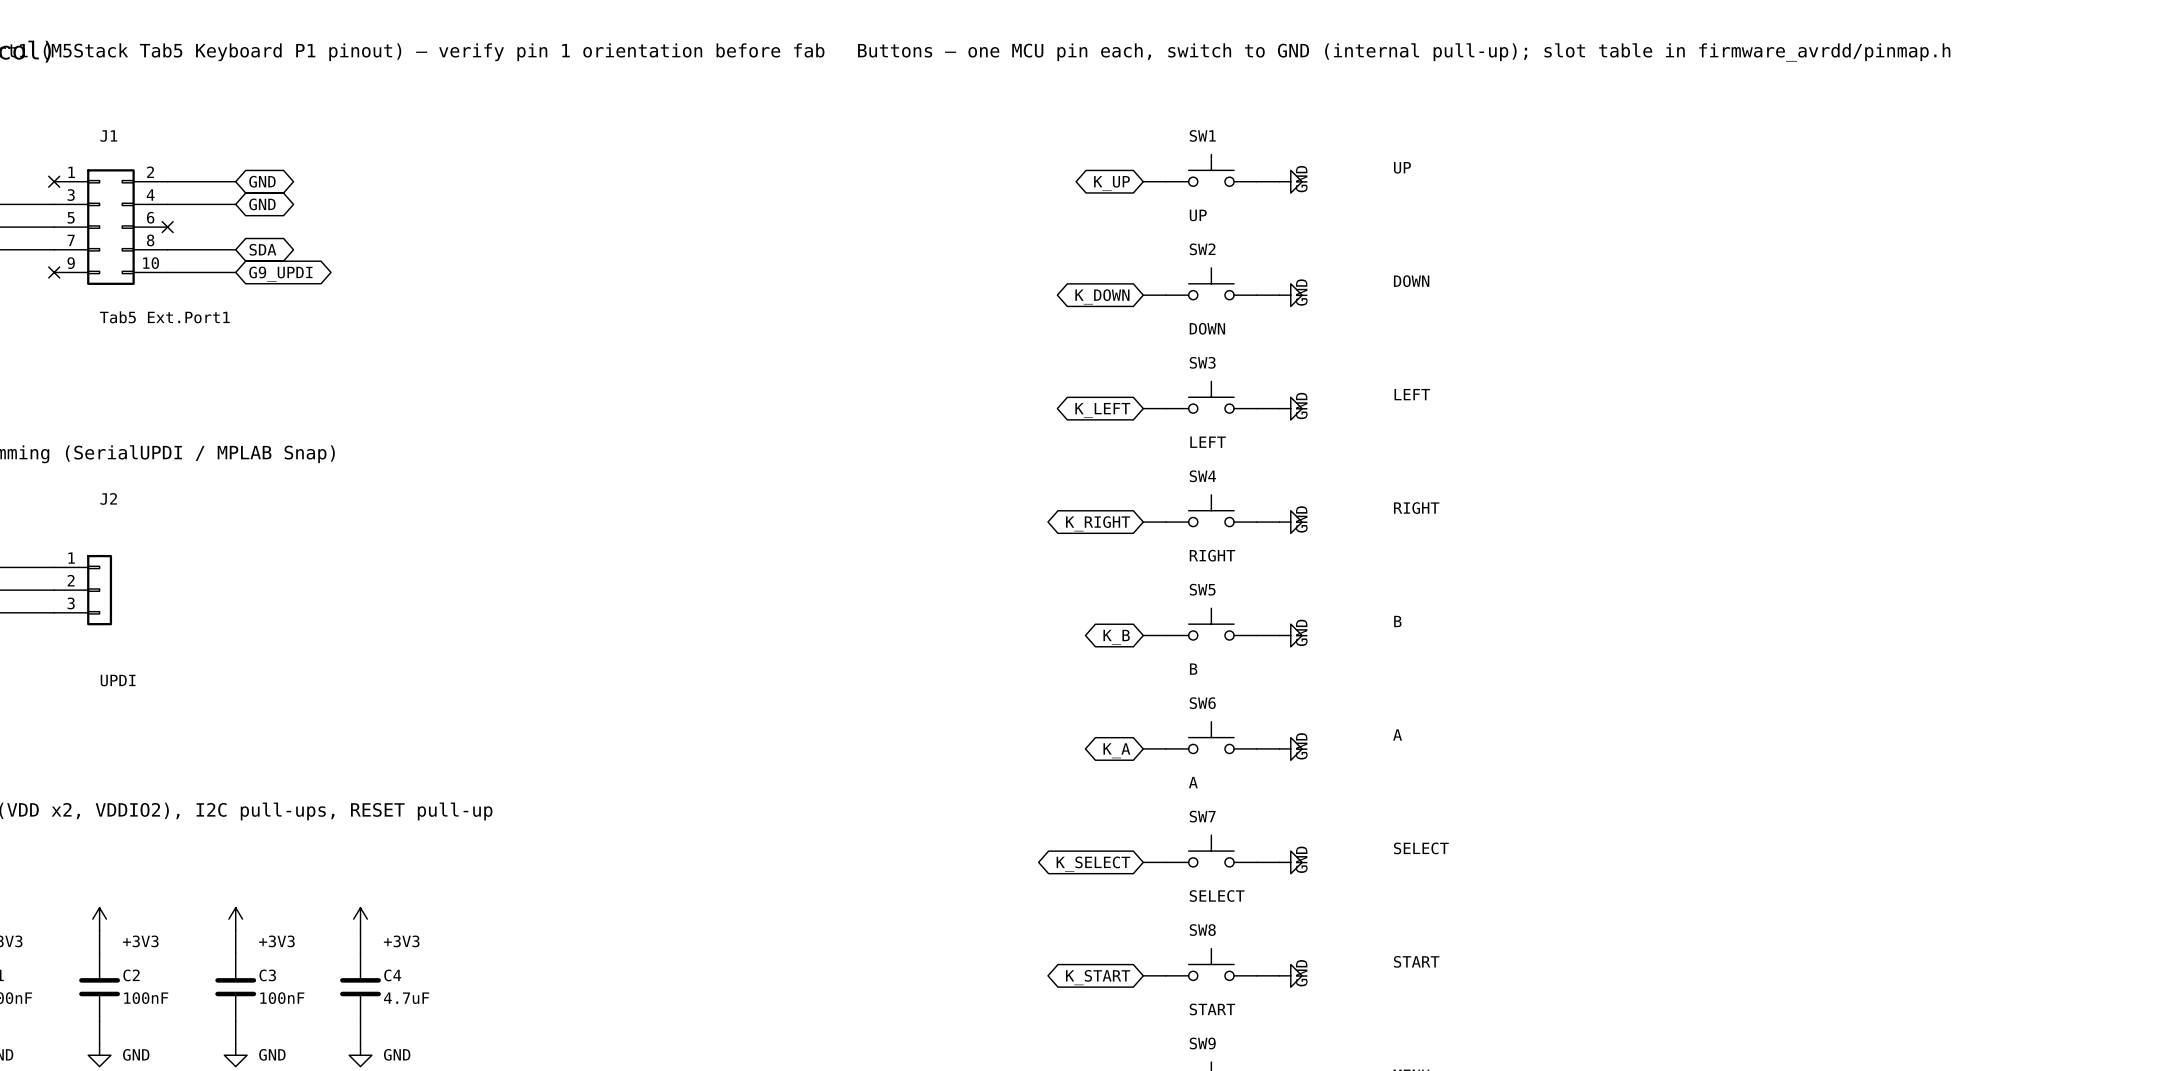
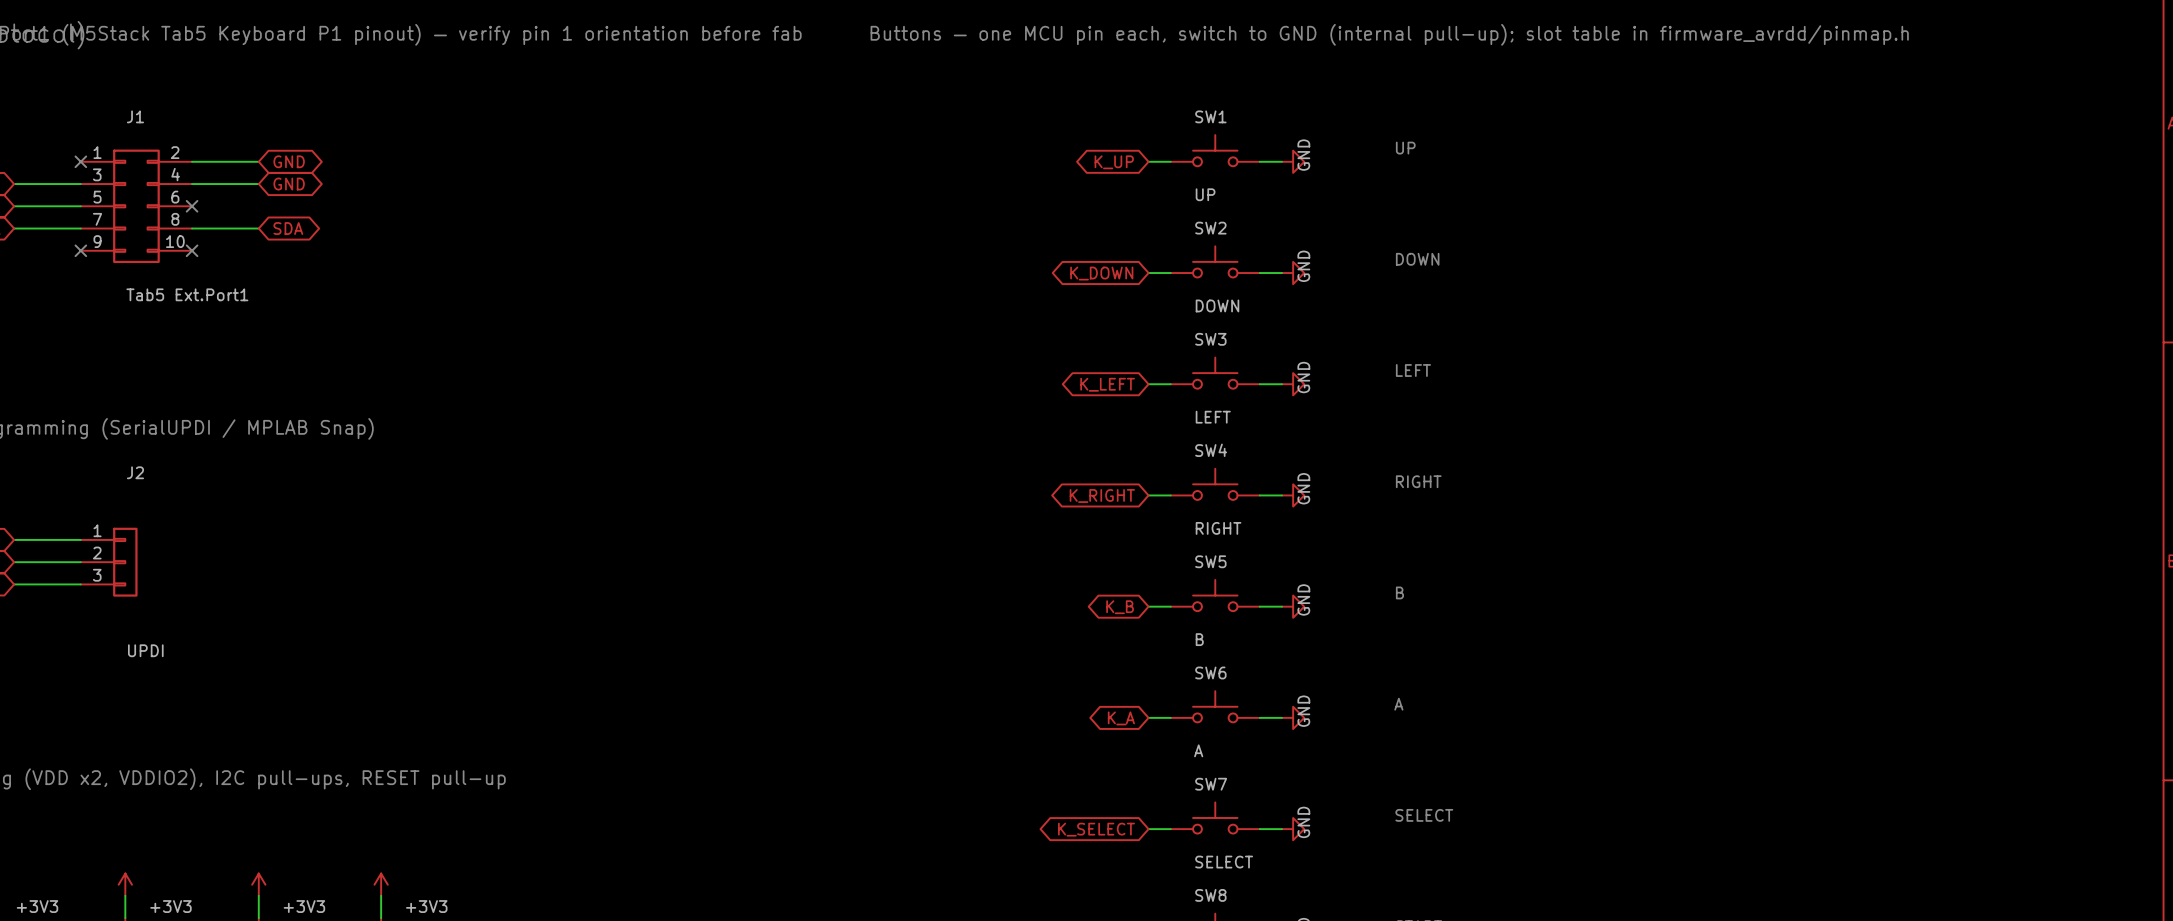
wire: (167, 272) (235, 272) -> none
no-connect mark: none -> (192, 250)
global label: G9_UPDI (280, 274) -> none

